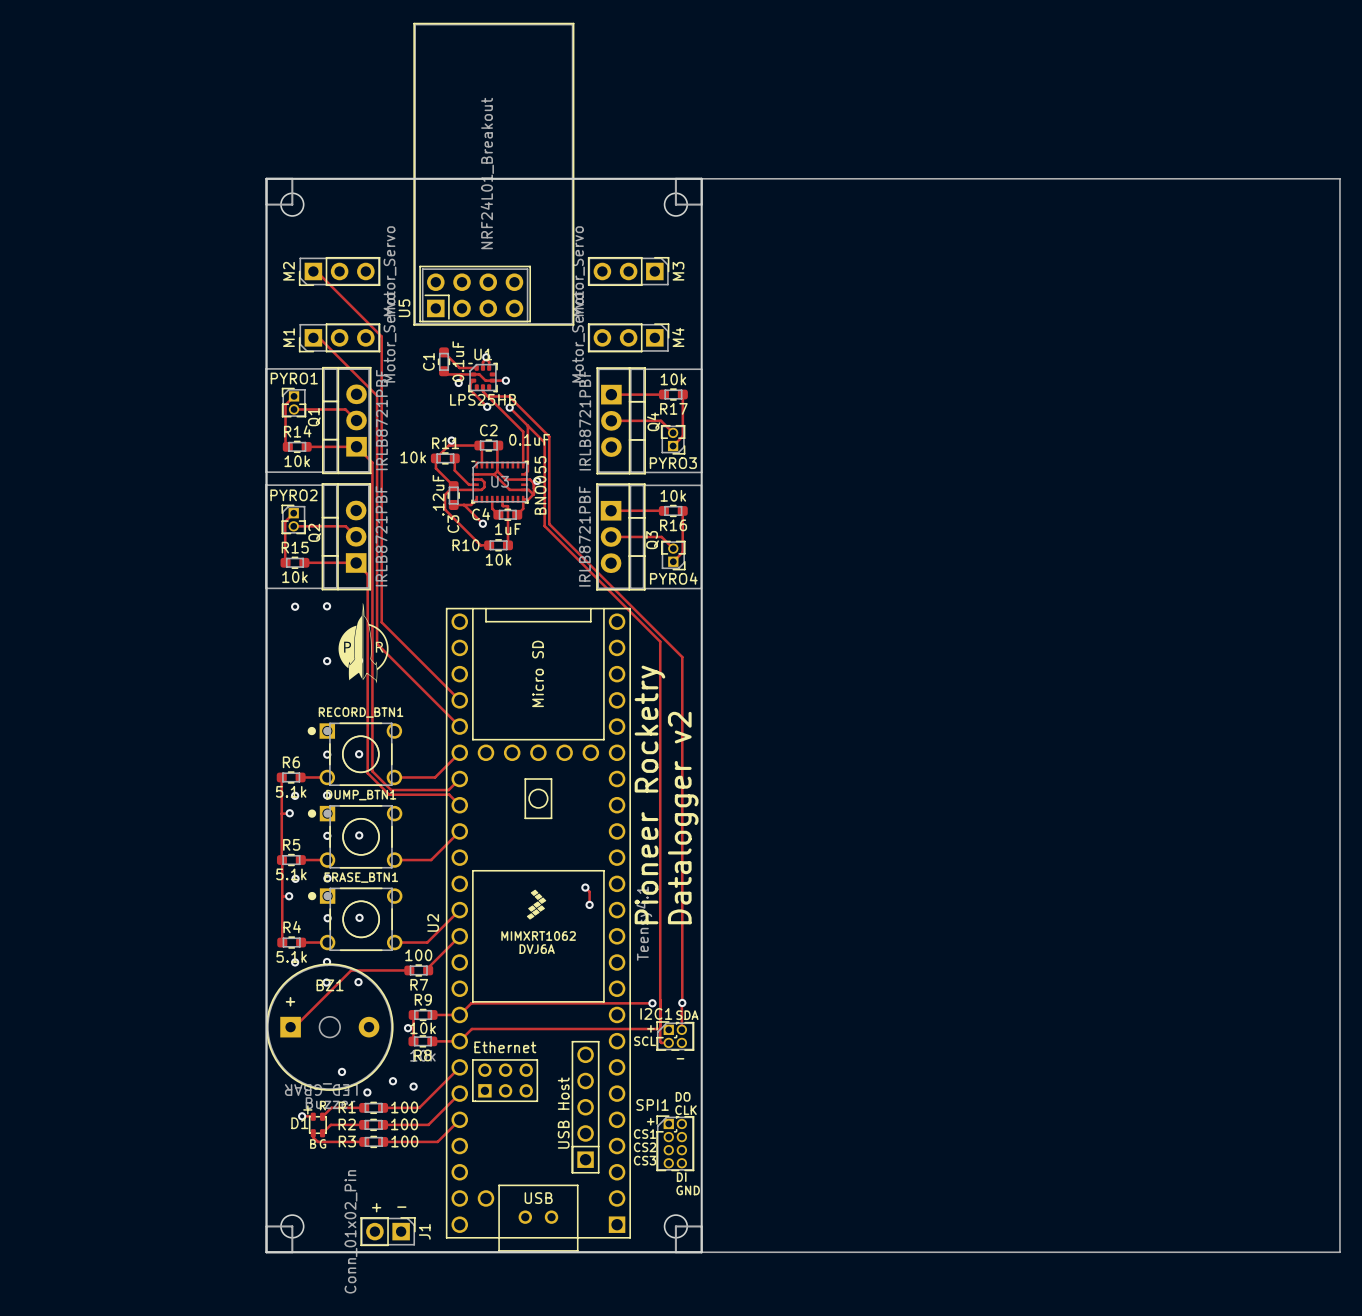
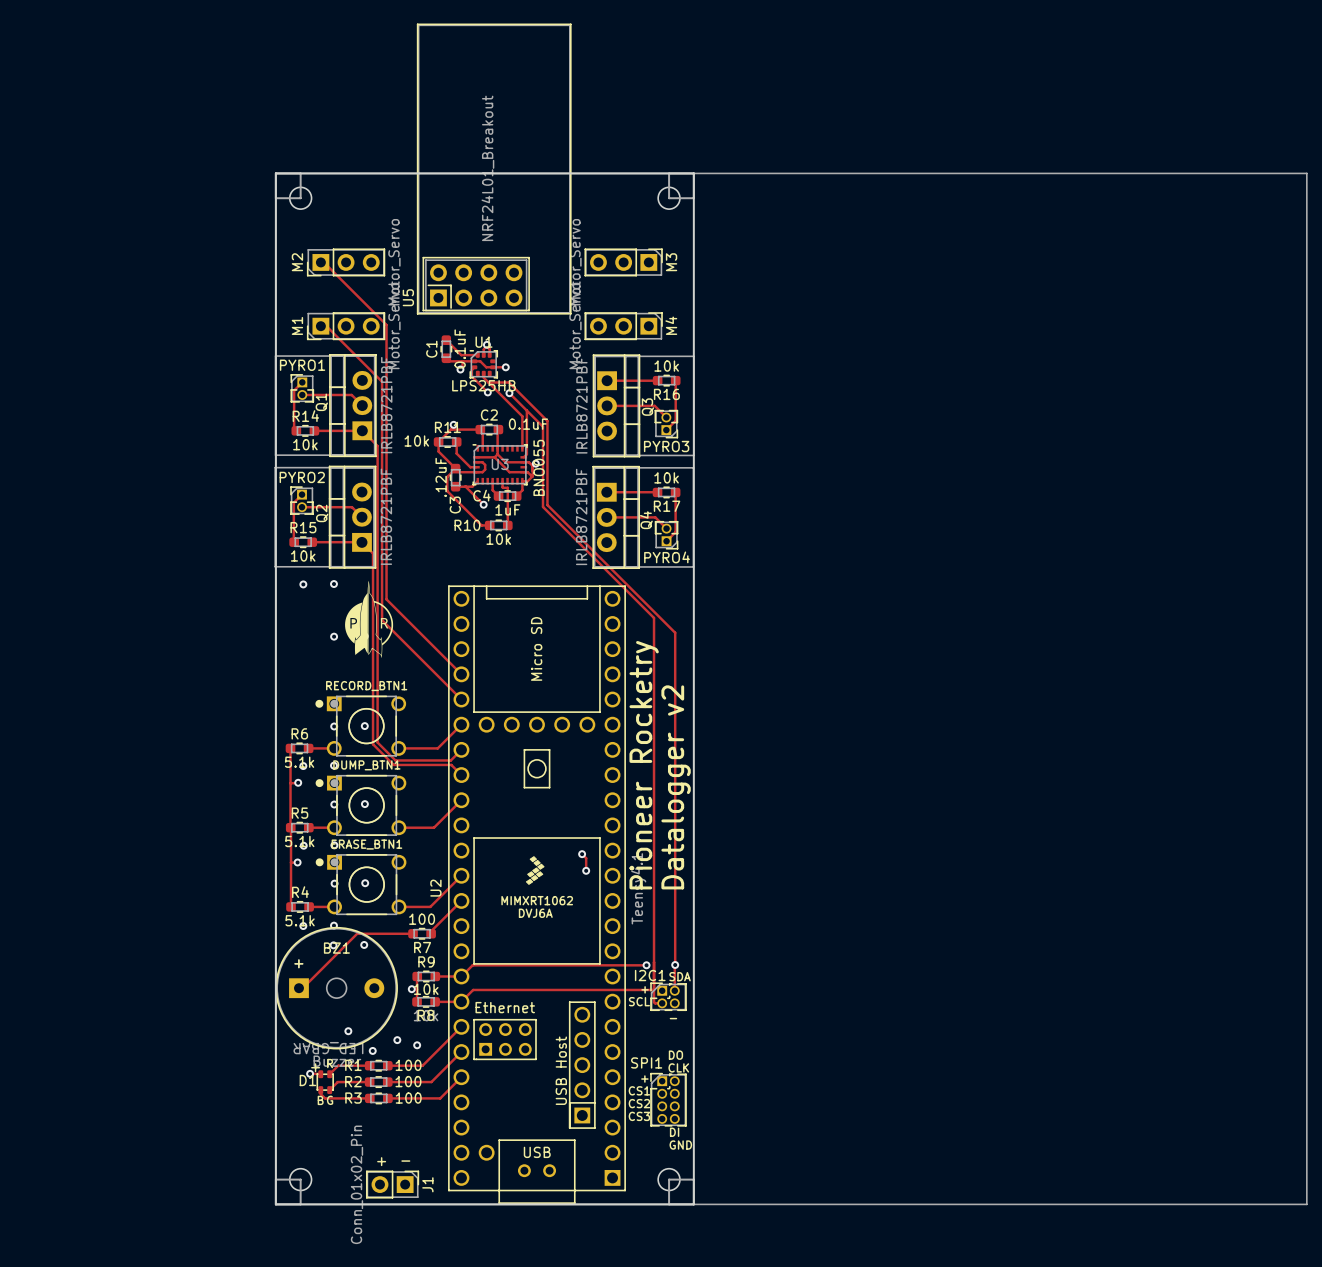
R17 name: R17 (673, 408) -> R16 (666, 394)
Q4 name: Q4 (653, 421) -> Q3 (647, 407)
R16 name: R16 (673, 525) -> R17 (667, 506)
Q3 name: Q3 (652, 540) -> Q4 (646, 520)

